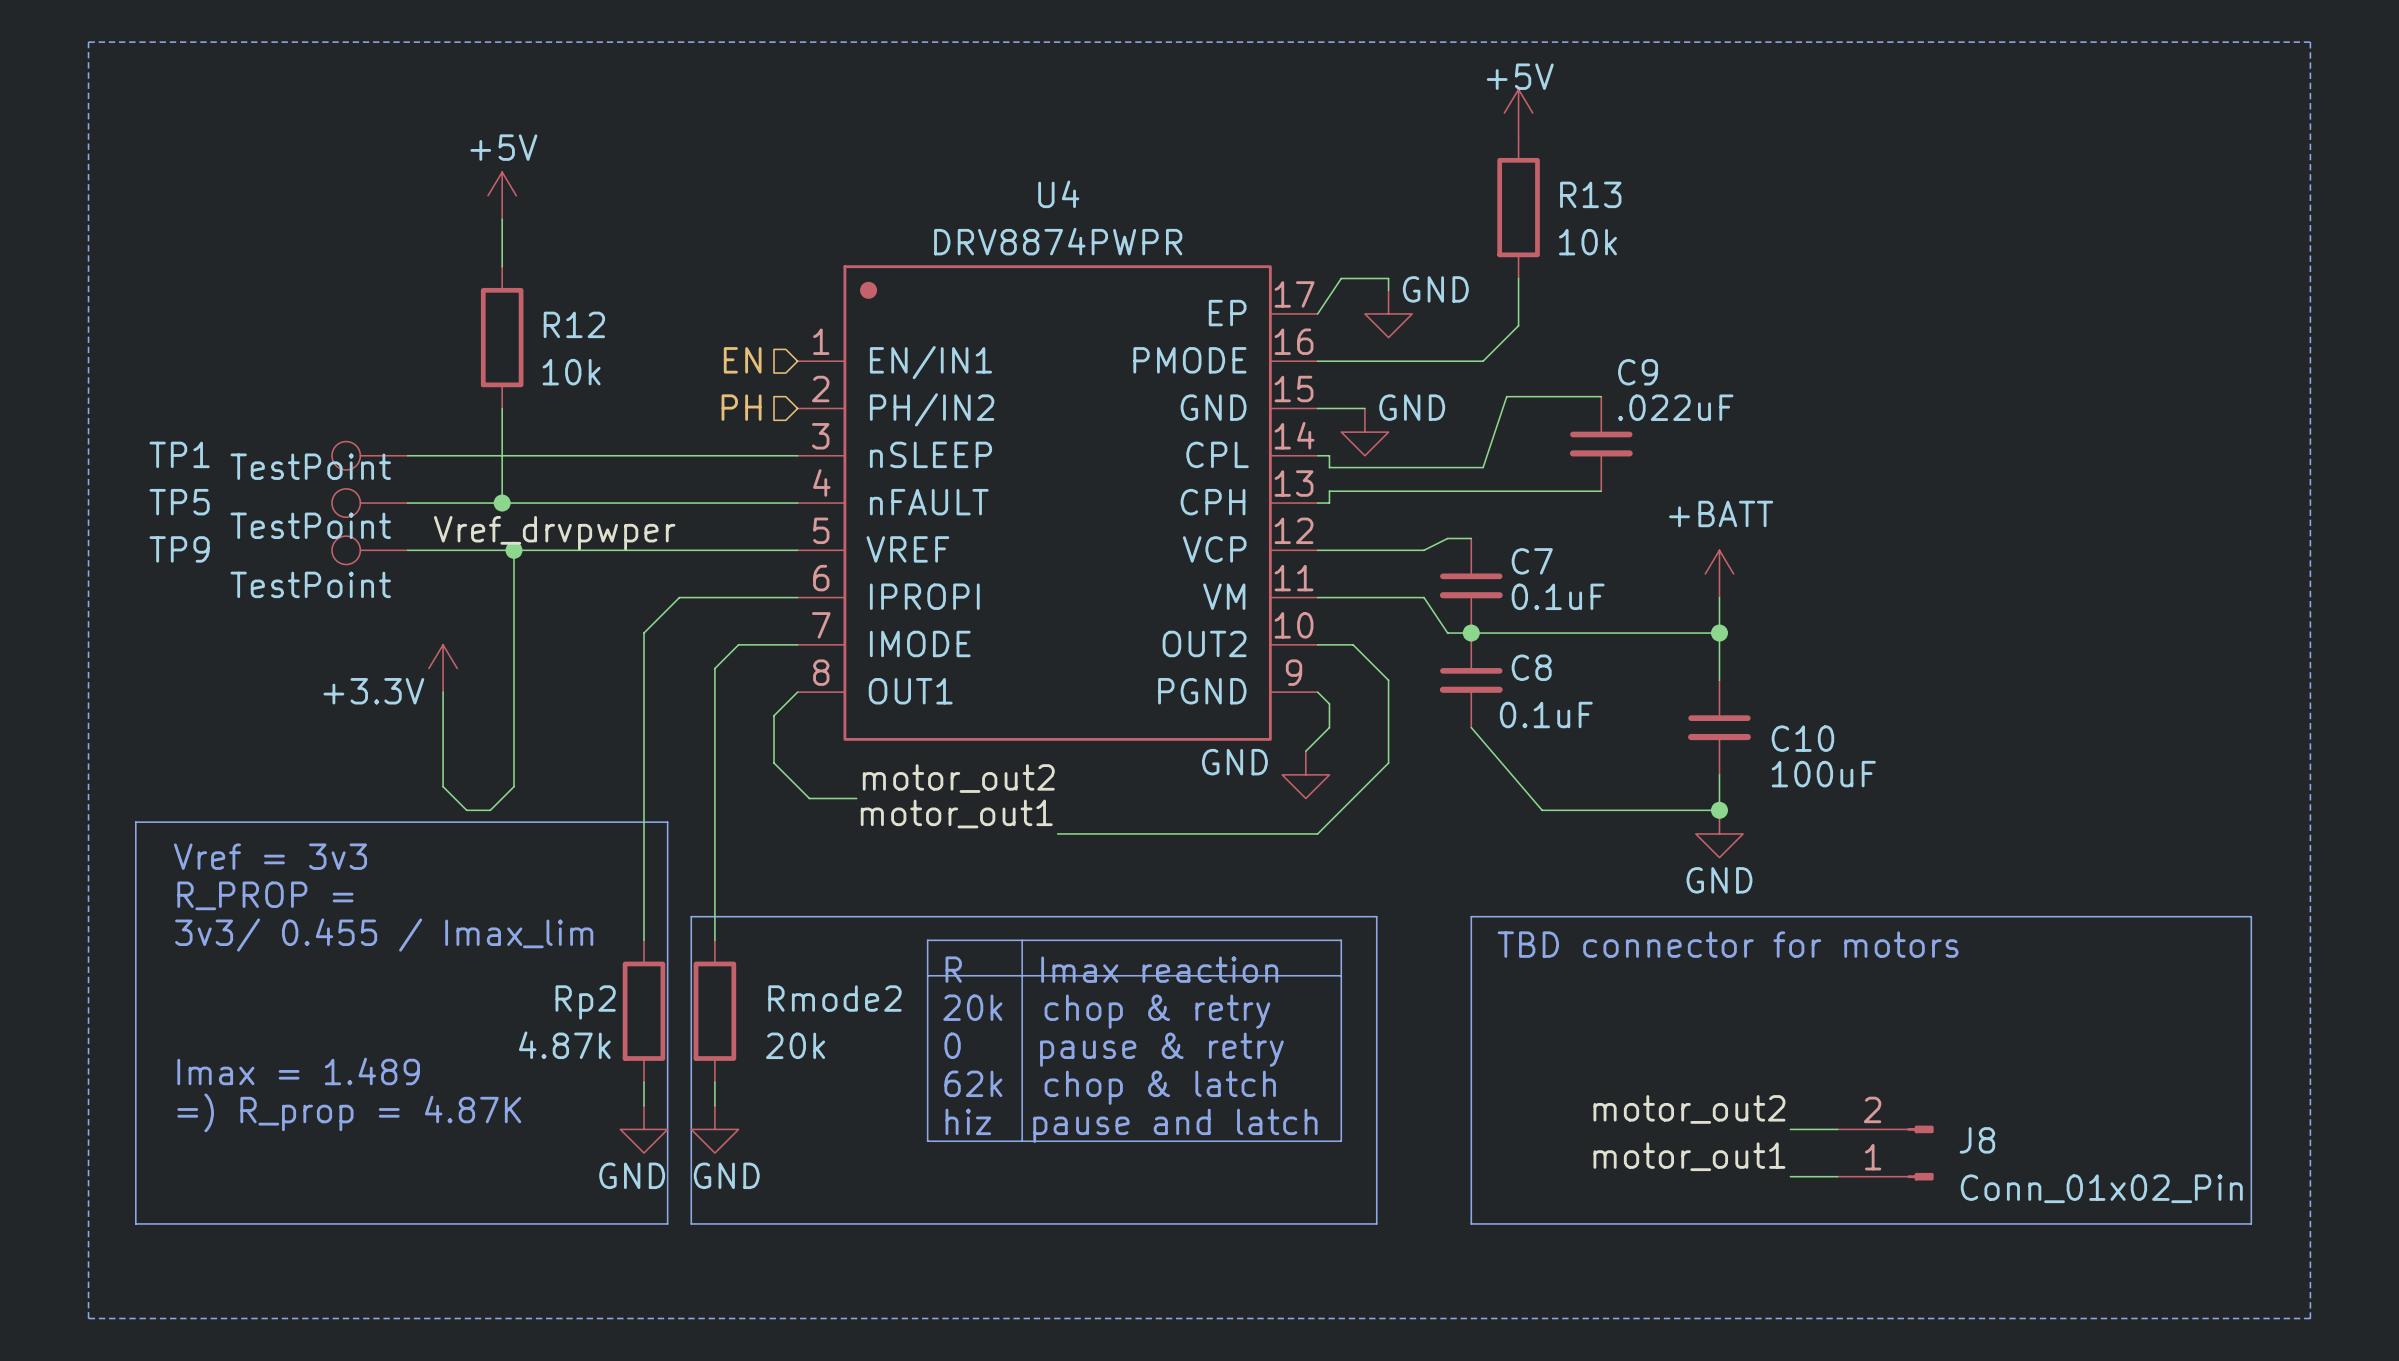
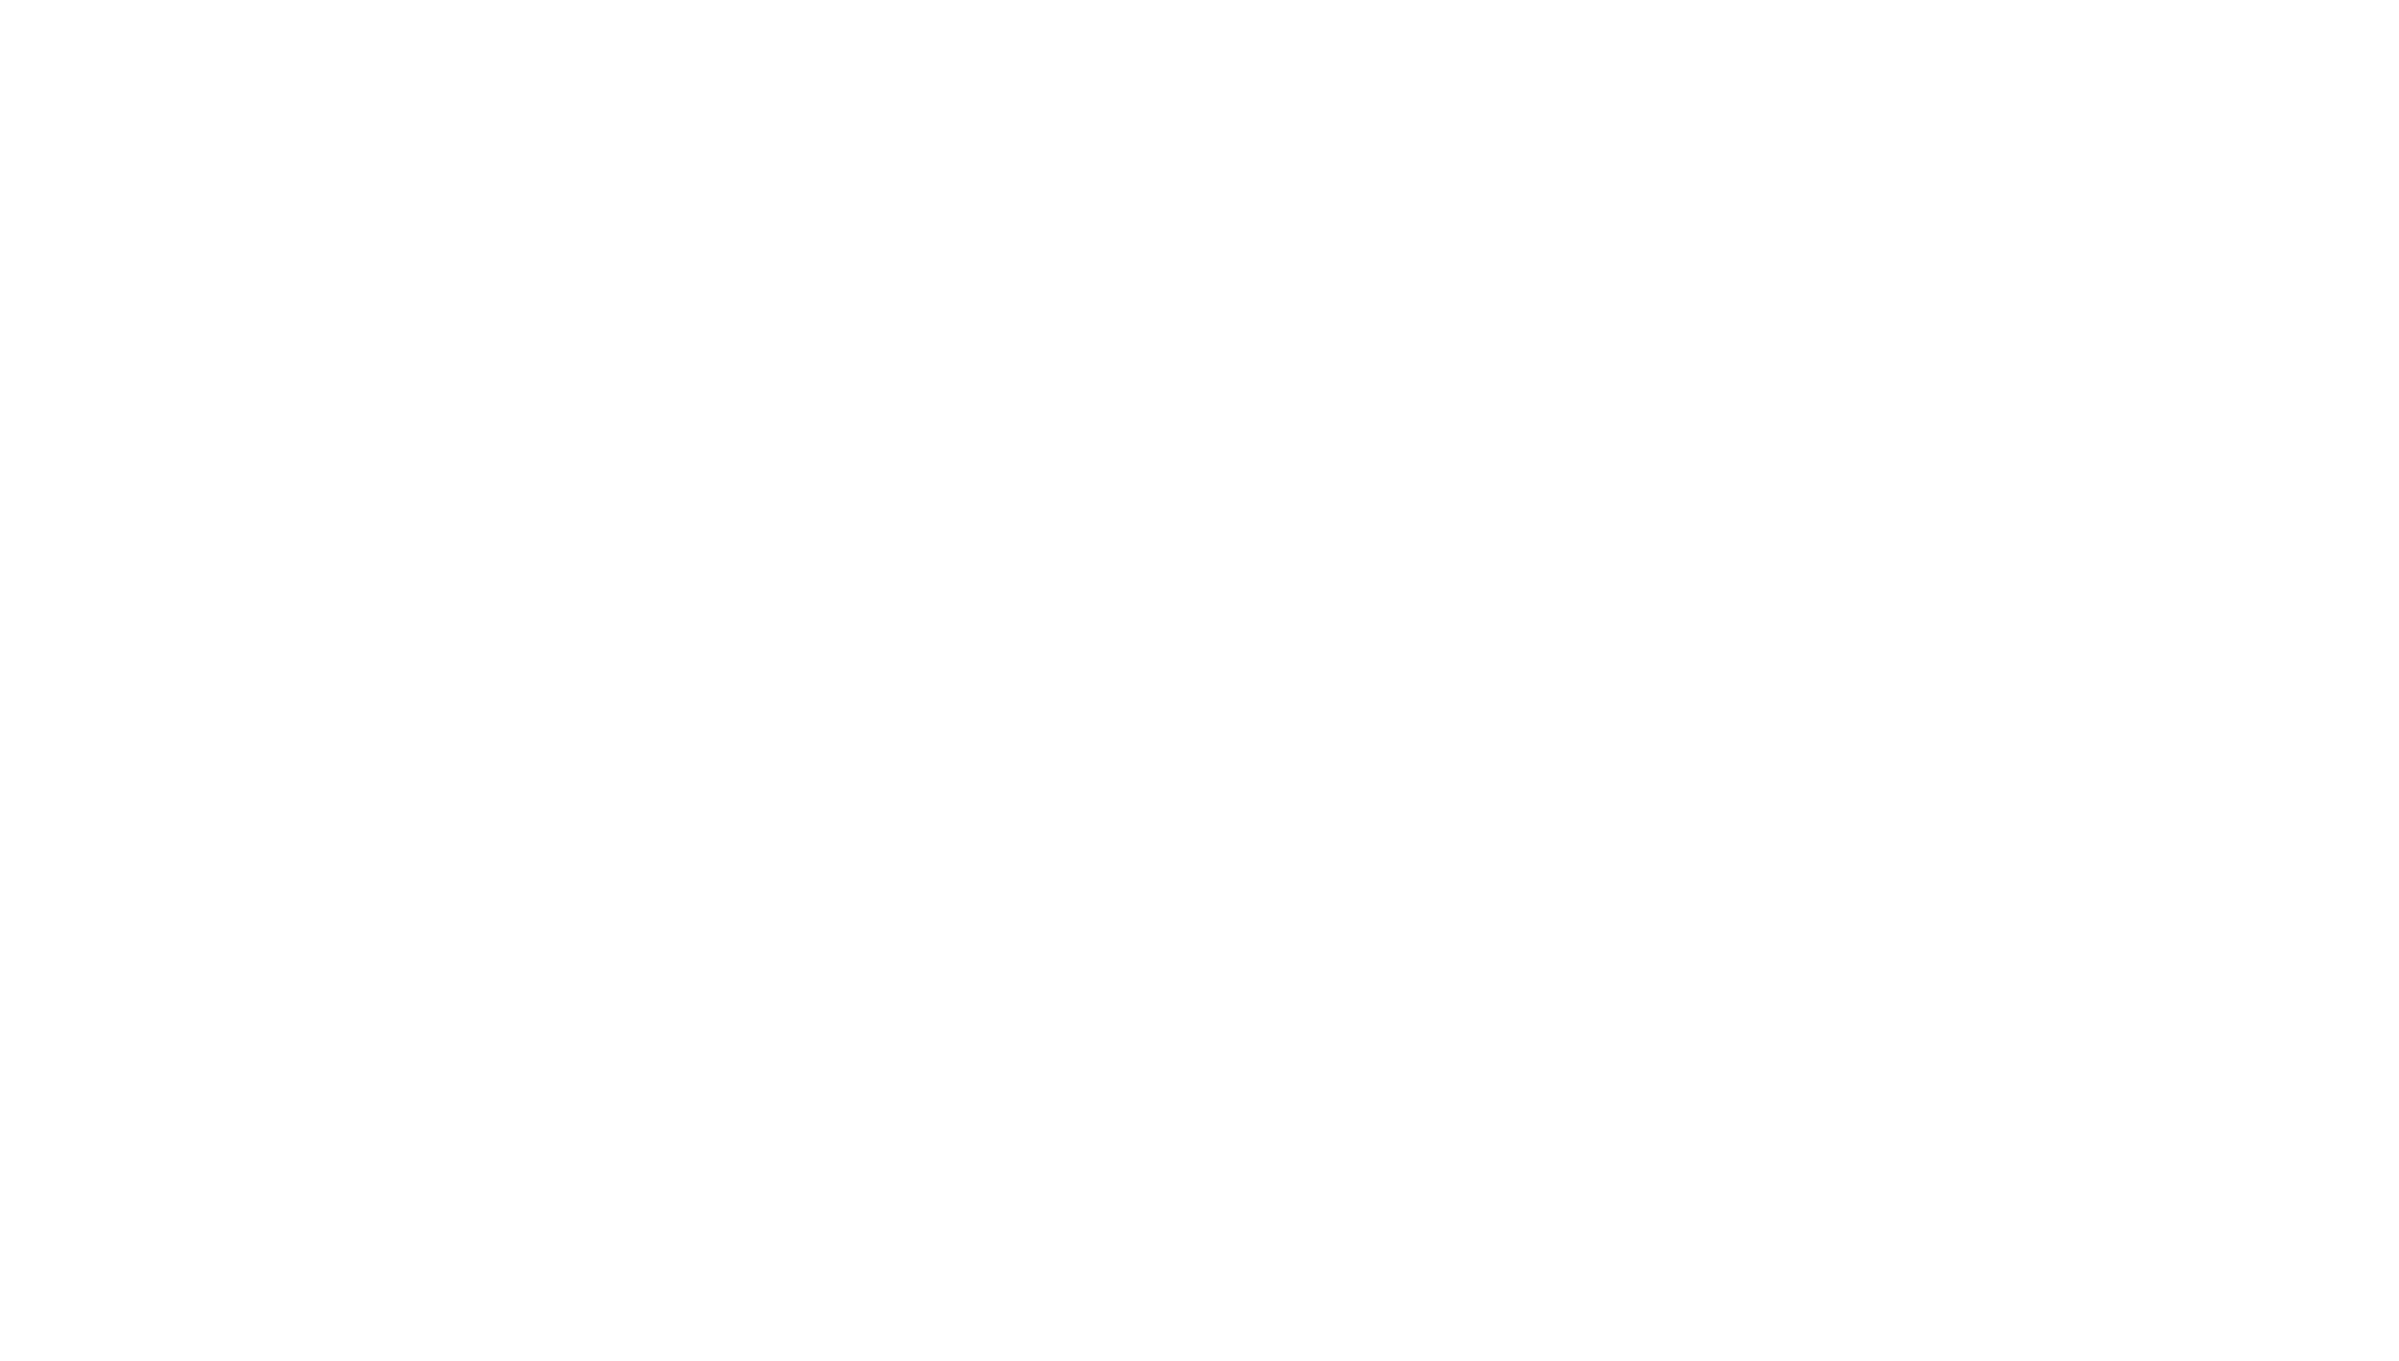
line: (88, 42) (2310, 42) (2310, 1318) (88, 1318) (88, 42) -> none
power symbol: +5V (1518, 113) -> none
power symbol: +5V (502, 195) -> none
R13: 10k (1518, 207) -> none
wire: (502, 219) (502, 266) -> none
wire: (1518, 278) (1518, 325) (1483, 361) (1317, 361) -> none
wire: (1388, 290) (1388, 278) (1341, 278) (1317, 313) -> none
power symbol: GND (1388, 313) -> none
R12: 10k (502, 337) -> none
hierarchical label: EN (742, 360) -> none
wire: (1601, 396) (1506, 396) (1483, 467) (1329, 467) (1329, 455) (1317, 455) -> none
hierarchical label: PH (741, 407) -> none
wire: (502, 408) (502, 503) -> none
wire: (1317, 408) (1364, 408) -> none
power symbol: GND (1364, 432) -> none
C9: .022uF (1601, 443) -> none
TP1: TestPoint (369, 455) -> none
wire: (407, 455) (797, 455) -> none
wire: (1601, 491) (1329, 491) (1329, 503) (1317, 503) -> none
TP5: TestPoint (369, 503) -> none
wire: (407, 503) (797, 503) -> none
junction: (502, 503) -> none
U4: DRV8874PWPR (1057, 503) -> none
label: Vref_drvpwper (554, 533) -> none
wire: (1471, 538) (1447, 538) (1424, 550) (1317, 550) -> none
TP9: TestPoint (369, 550) -> none
wire: (407, 550) (797, 550) -> none
wire: (513, 550) (513, 786) (490, 810) (466, 810) (443, 786) (443, 692) -> none
junction: (513, 550) -> none
power symbol: +BATT (1719, 573) -> none
C7: 0.1uF (1471, 585) -> none
wire: (797, 597) (679, 597) (644, 633) (644, 940) -> none
wire: (1317, 597) (1424, 597) (1447, 633) (1719, 633) -> none
wire: (1719, 597) (1719, 680) -> none
junction: (1471, 633) -> none
junction: (1719, 633) -> none
wire: (797, 644) (738, 644) (714, 668) (714, 940) -> none
wire: (1317, 644) (1353, 644) (1388, 680) (1388, 763) (1317, 833) (1057, 833) -> none
power symbol: +3.3V (443, 668) -> none
C8: 0.1uF (1471, 680) -> none
wire: (797, 692) (774, 715) (774, 763) (809, 798) (856, 798) -> none
wire: (1317, 692) (1329, 703) (1329, 727) (1305, 751) -> none
wire: (1471, 727) (1542, 810) (1719, 810) (1719, 774) -> none
C10: 100uF (1719, 727) -> none
power symbol: GND (1305, 774) -> none
label: motor_out2 (958, 778) -> none
junction: (1719, 810) -> none
label: motor_out1 (956, 813) -> none
line: (135, 822) (667, 822) (667, 1223) (135, 1223) (135, 822) -> none
power symbol: GND (1719, 833) -> none
text: Vref = 3v3 (270, 856) -> none
text: R_PROP = (265, 895) -> none
line: (691, 916) (1376, 916) (1376, 1223) (691, 1223) (691, 916) -> none
line: (1471, 916) (2251, 916) (2251, 1223) (1471, 1223) (1471, 916) -> none
text: 3v3/ 0.455 / Imax_lim (384, 935) -> none
line: (927, 940) (1341, 940) (1341, 1141) (927, 1141) (927, 940) -> none
line: (1022, 940) (1022, 1141) -> none
text: TBD connector for motors (1728, 944) -> none
text: R Imax reaction (1111, 969) -> none
line: (927, 975) (1341, 975) -> none
Rp2: 4.87k (644, 1011) -> none
Rmode2: 20k (714, 1011) -> none
text: 20k chop & retry (1106, 1011) -> none
text: 0 pause & retry (1114, 1049) -> none
text: Imax = 1.489 (298, 1071) -> none
wire: (644, 1082) (644, 1105) -> none
wire: (714, 1082) (714, 1105) -> none
text: 62k chop & latch (1110, 1087) -> none
label: motor_out2 (1689, 1109) -> none
text: =) R_prop = 4.87K (349, 1112) -> none
text: hiz pause and latch (1131, 1125) -> none
power symbol: GND (644, 1129) -> none
power symbol: GND (714, 1129) -> none
wire: (1790, 1129) (1837, 1129) -> none
J8: Conn_01x02_Pin (1885, 1153) -> none
label: motor_out1 (1689, 1156) -> none
wire: (1790, 1176) (1837, 1176) -> none

